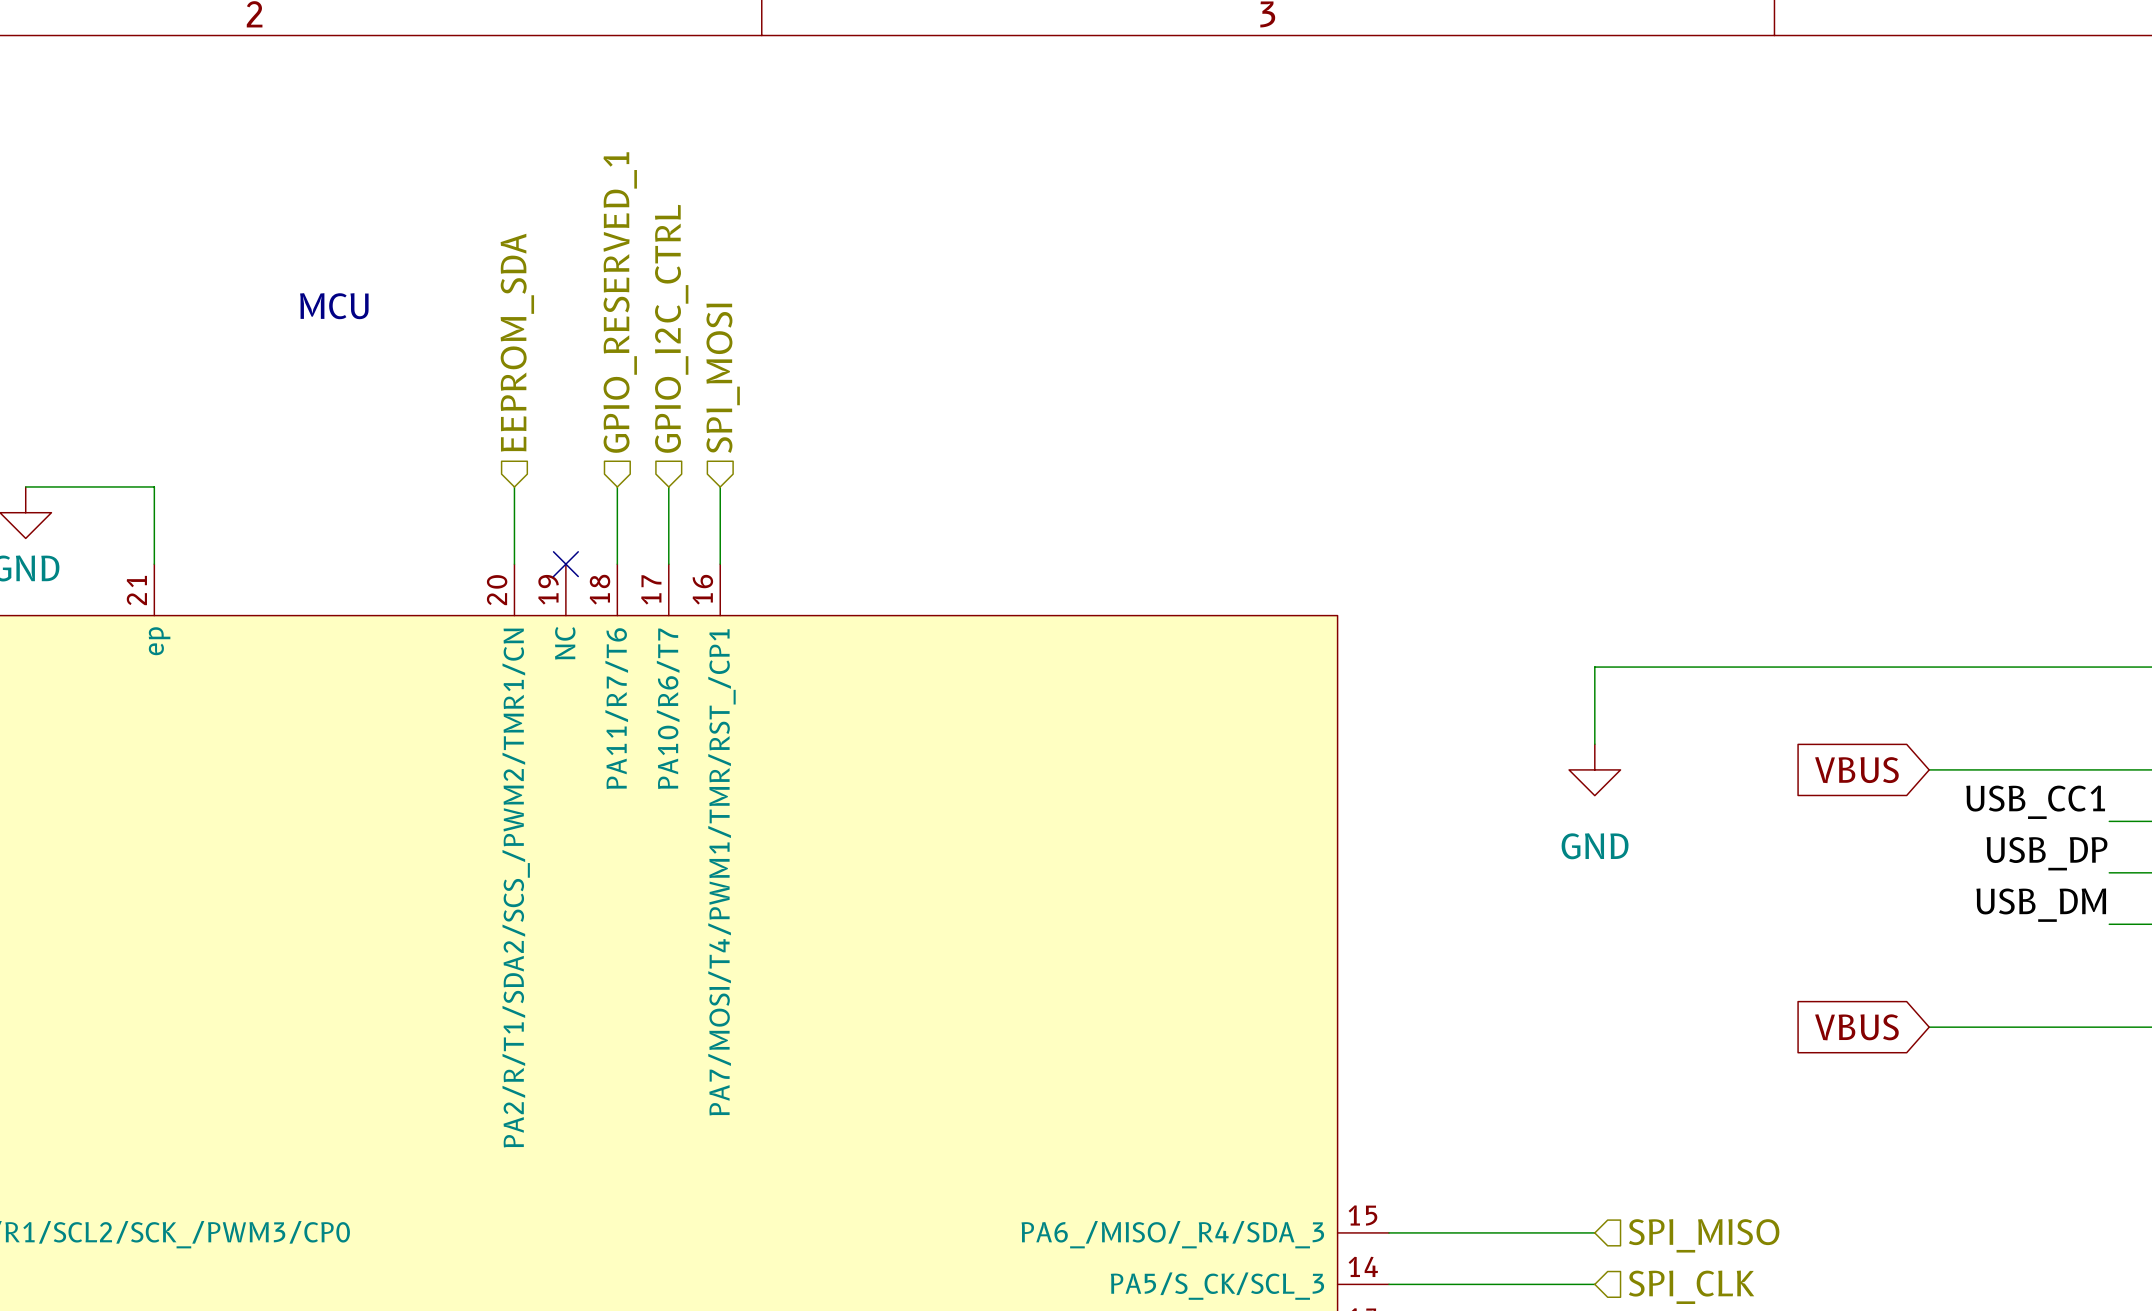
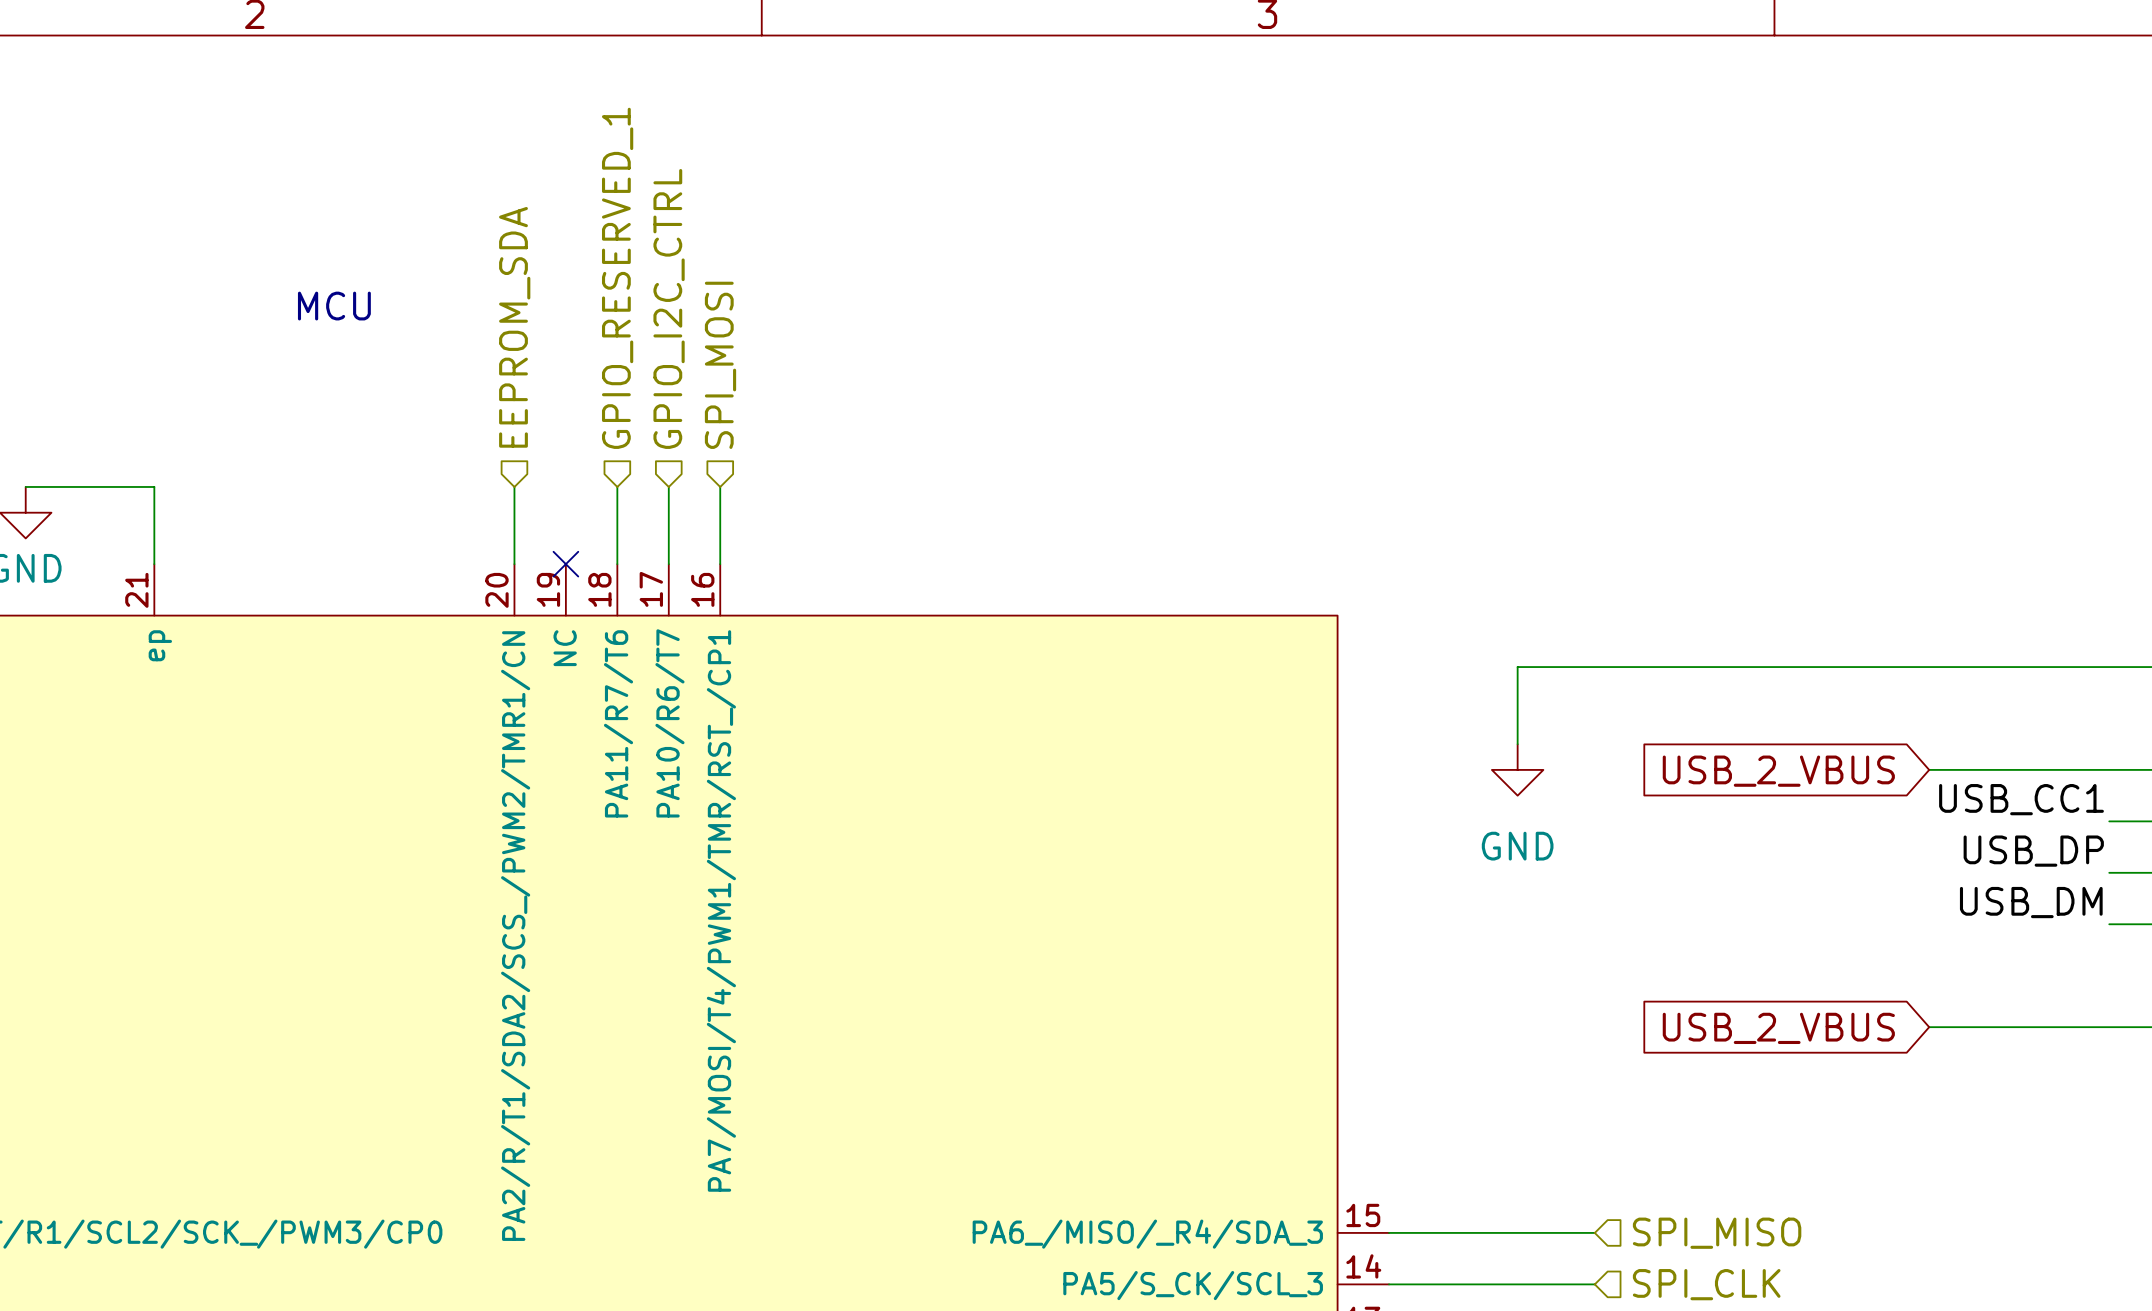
wire: (1594, 667) (1594, 744) -> (1594, 667) (1517, 667) (1517, 744)
power symbol position: GND (1594, 769) -> GND (1517, 769)
global label: VBUS (1856, 770) -> USB_2_VBUS (1778, 771)
global label: VBUS (1856, 1027) -> USB_2_VBUS (1778, 1028)

